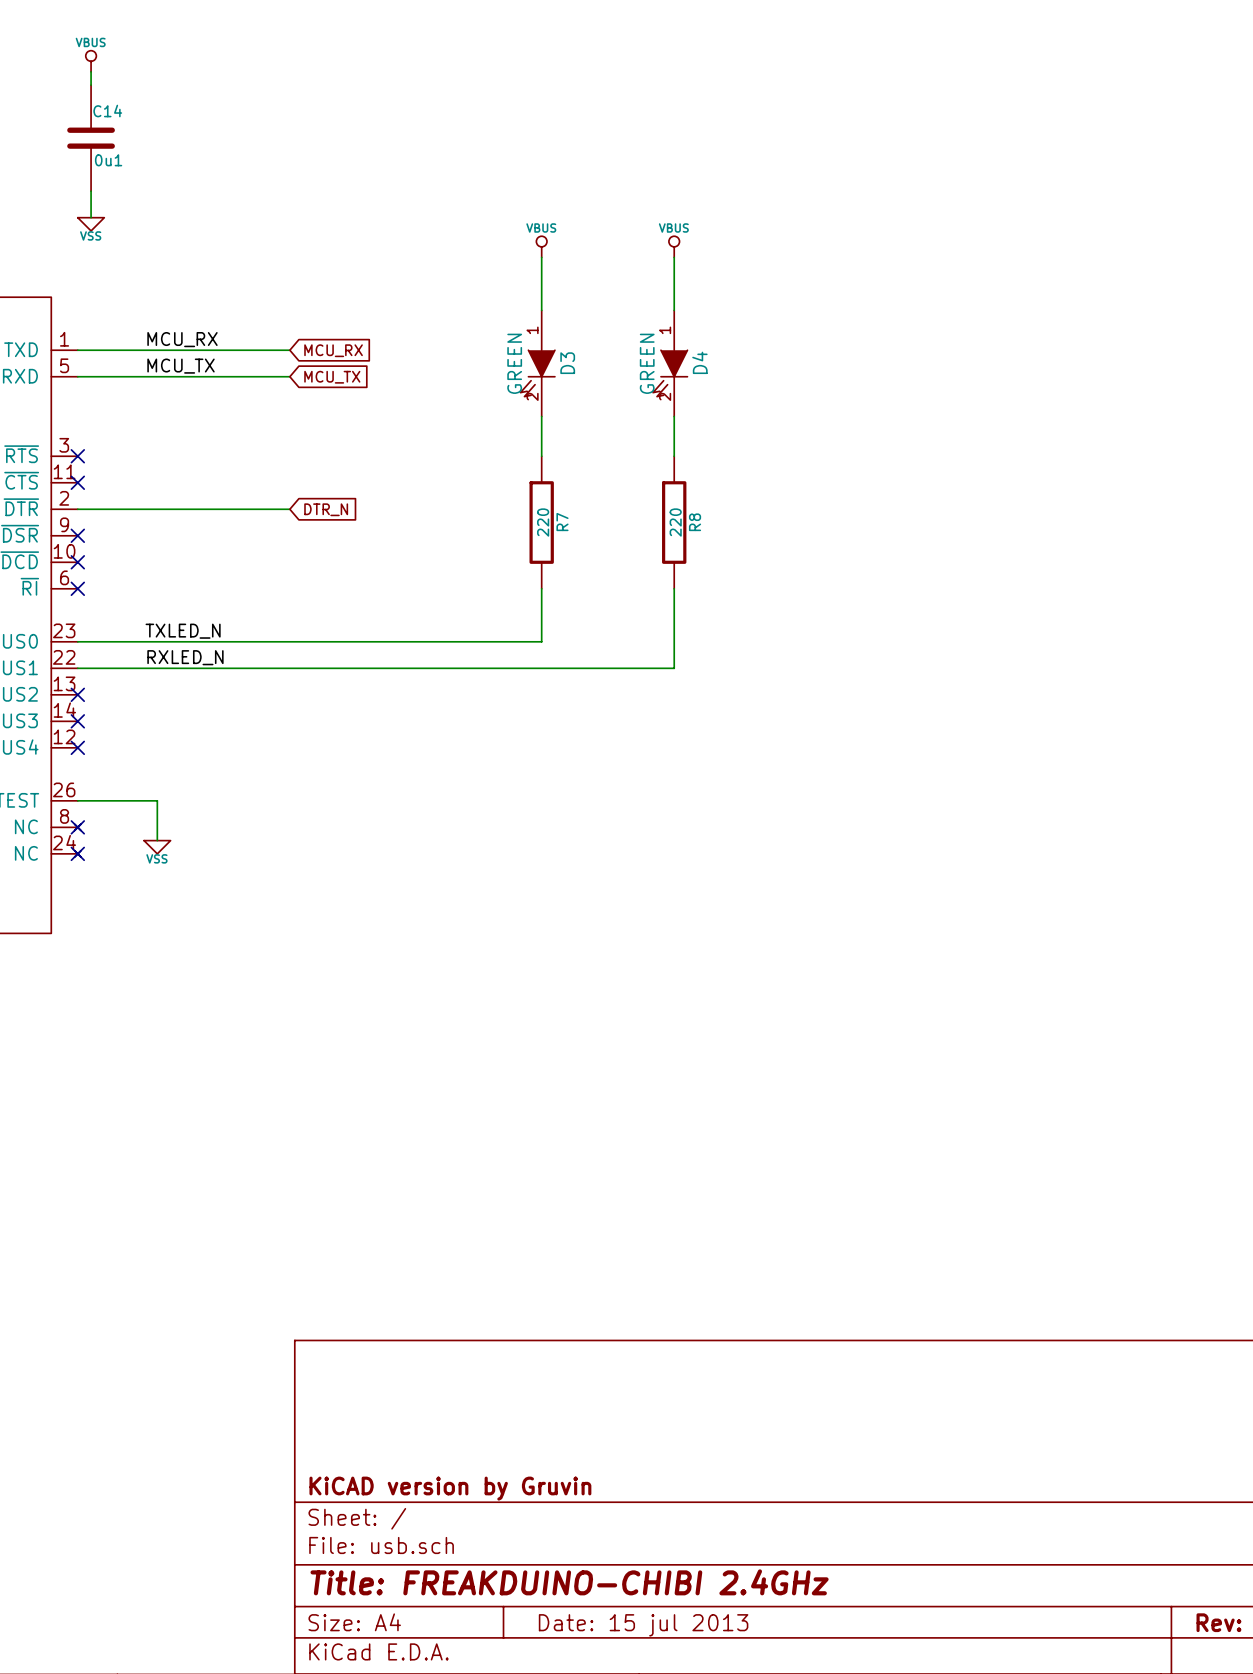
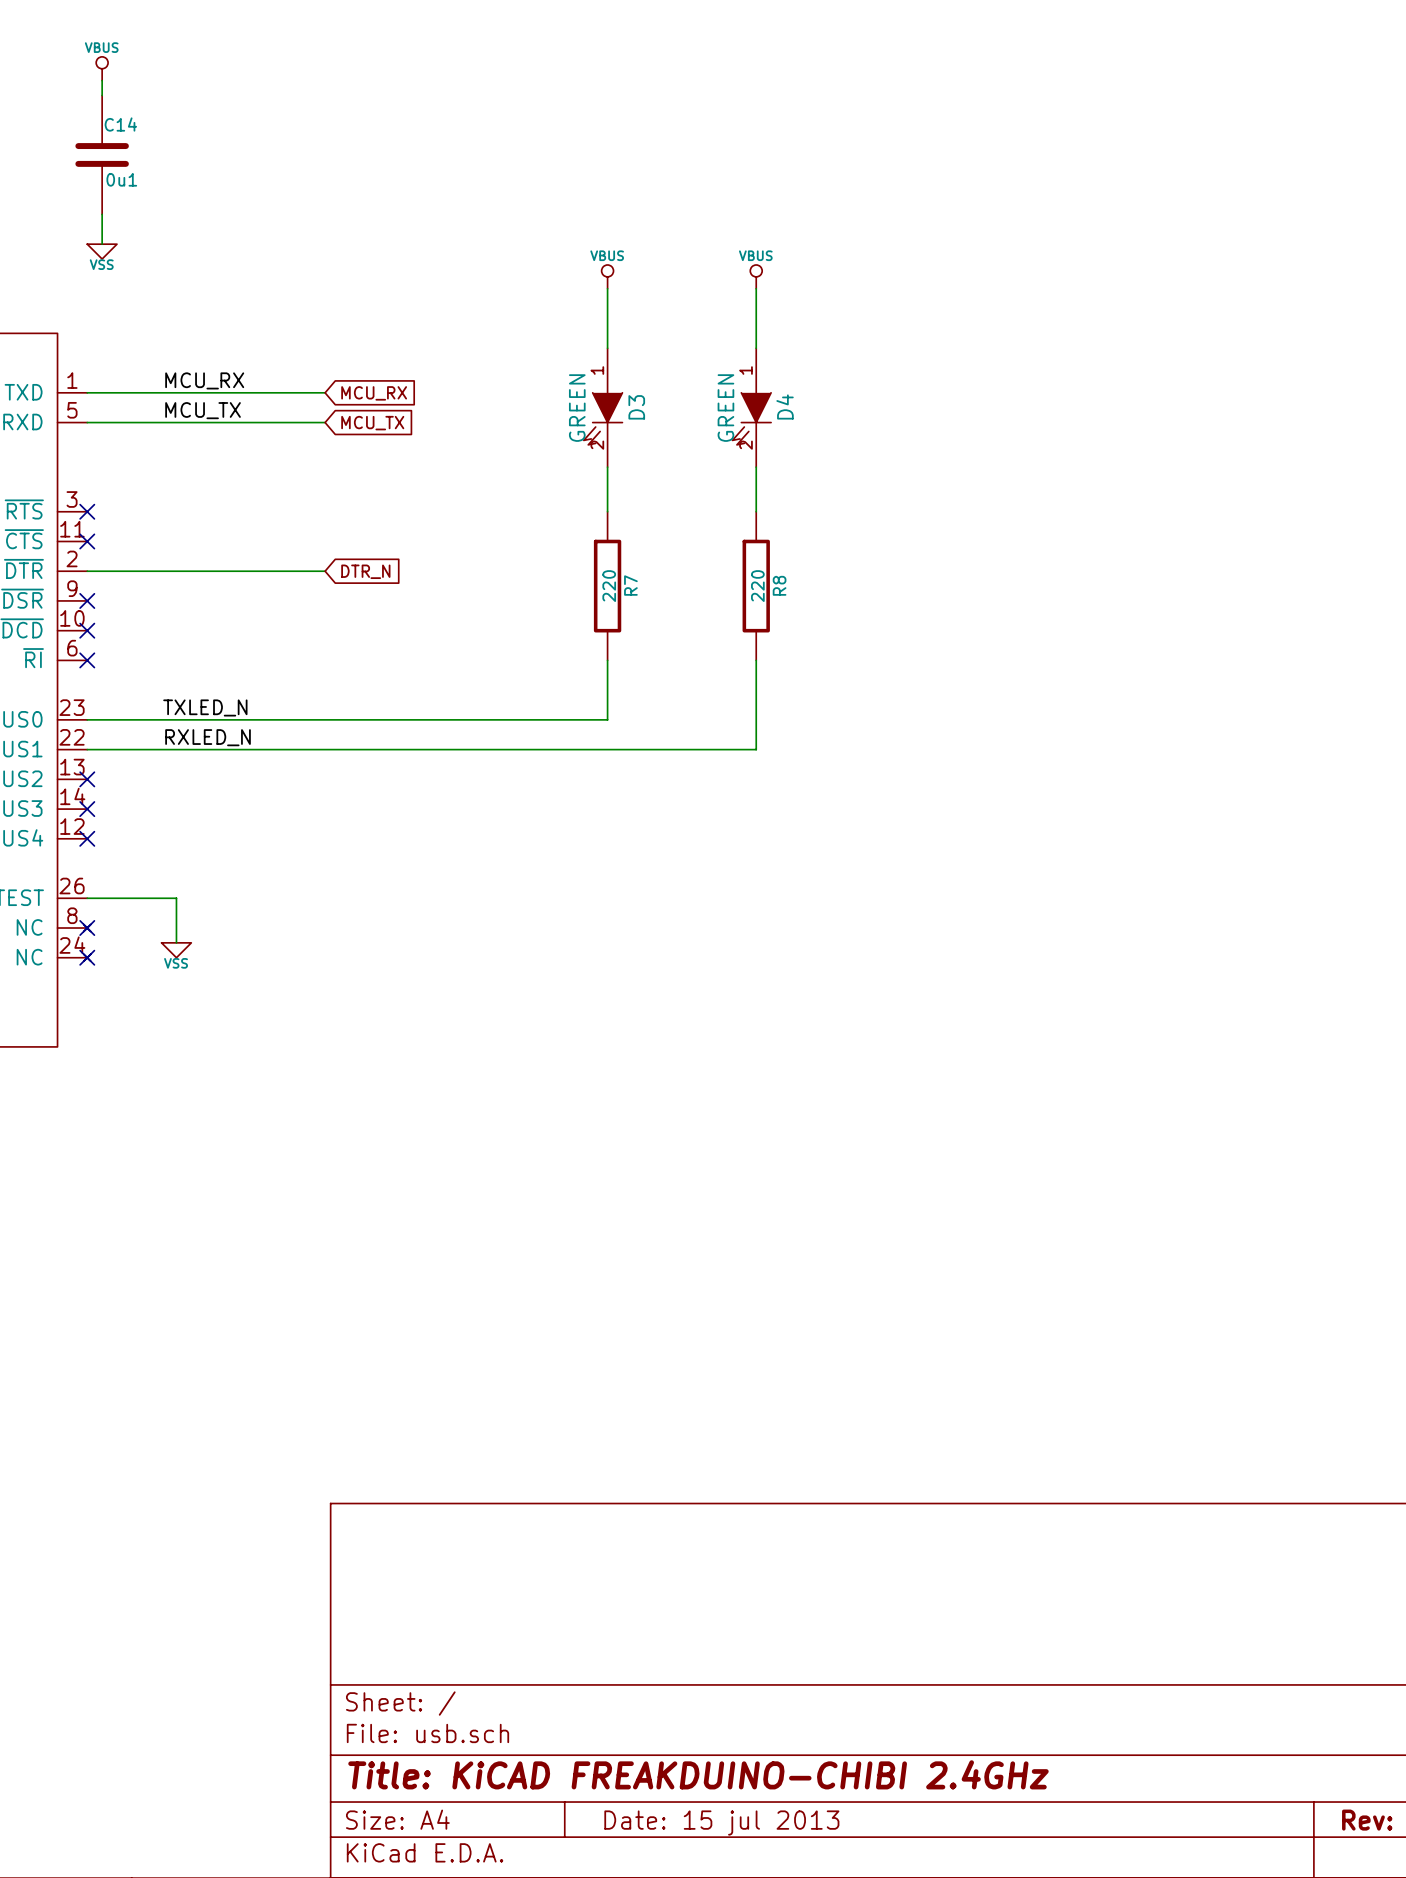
title block: KiCAD version by Gruvin (450, 1488) -> none
title block: Title: FREAKDUINO-CHIBI 2.4GHz (569, 1582) -> Title: KiCAD FREAKDUINO-CHIBI 2.4GHz (698, 1774)

